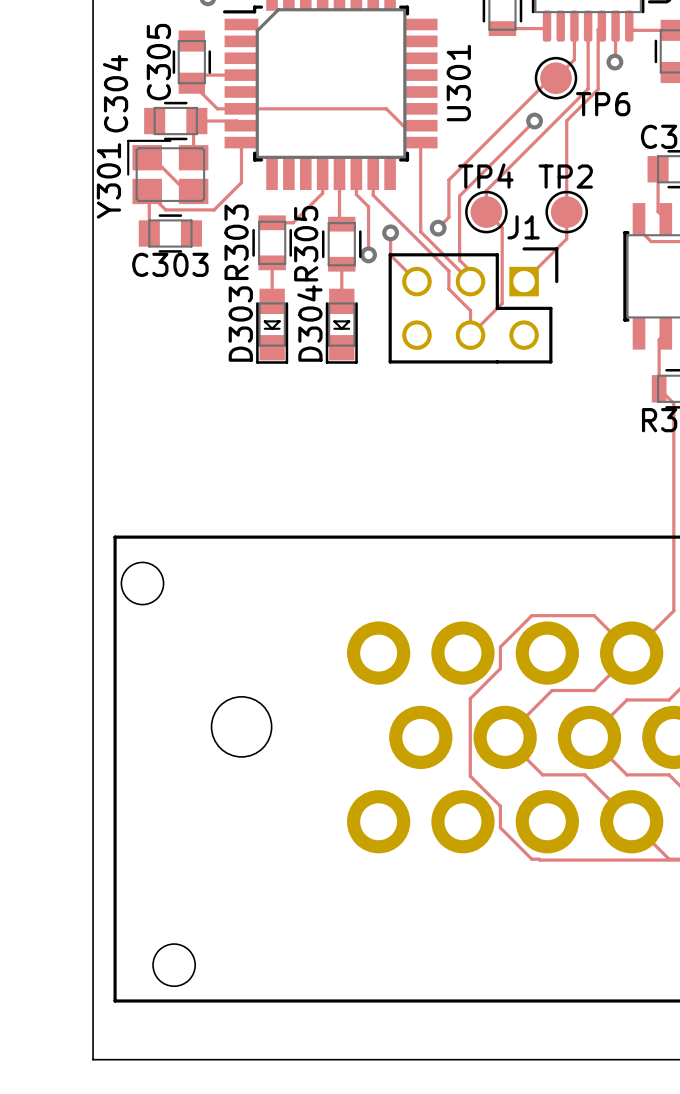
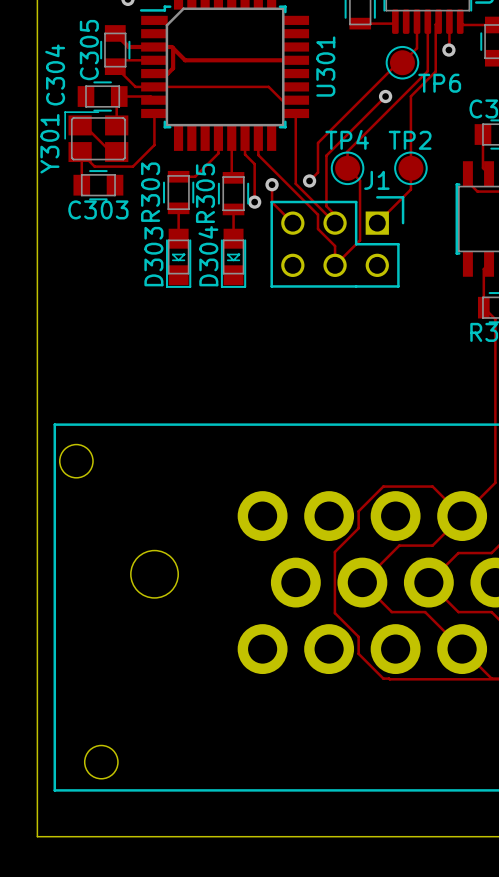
track: none -> (115, 33) (128, 47) (171, 47) (185, 60) (295, 60)
track: none -> (173, 48) (173, 68) (167, 73) (154, 73)

